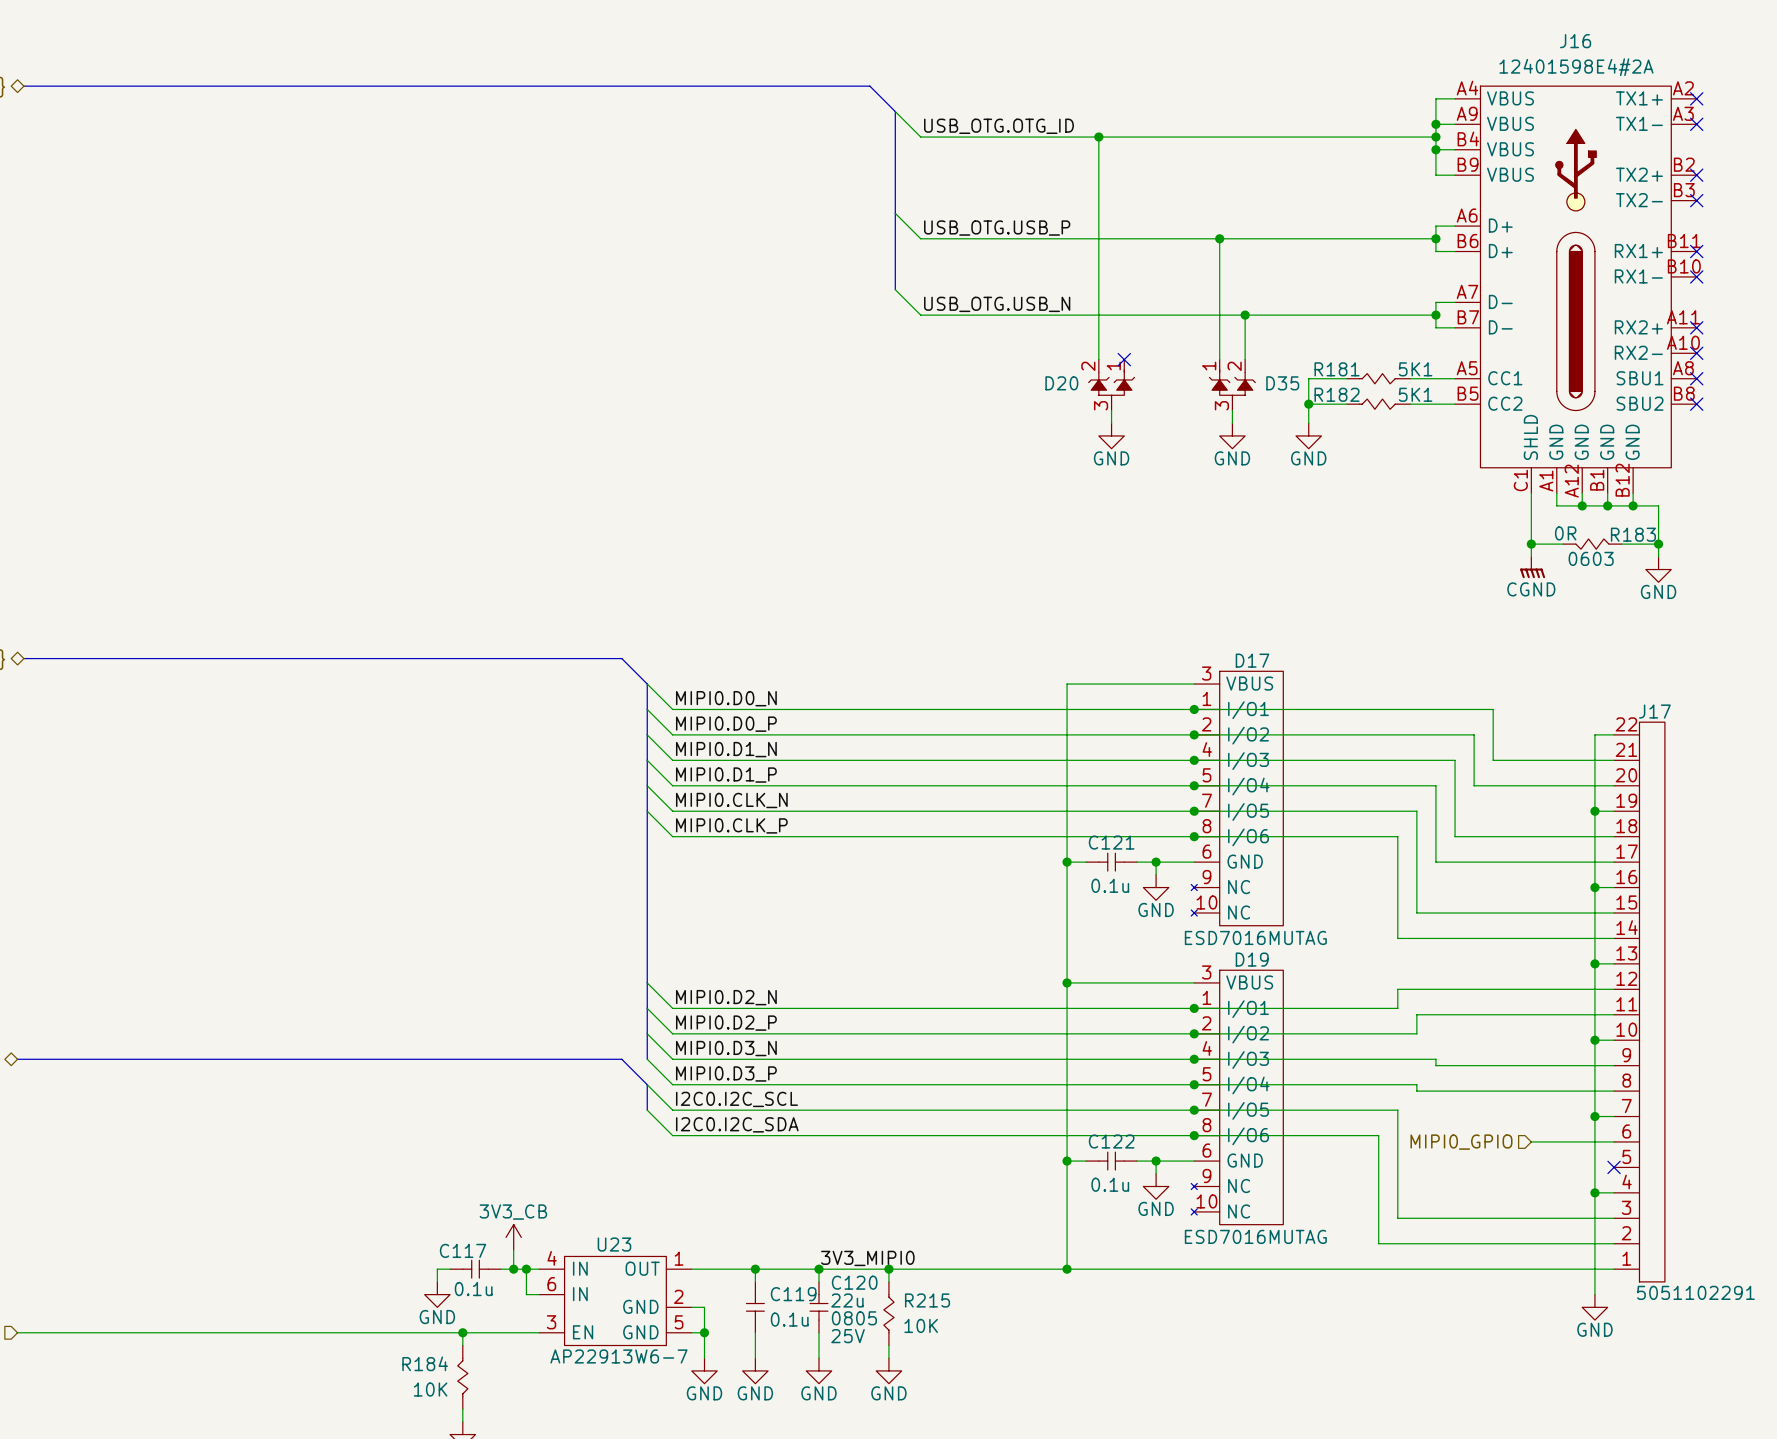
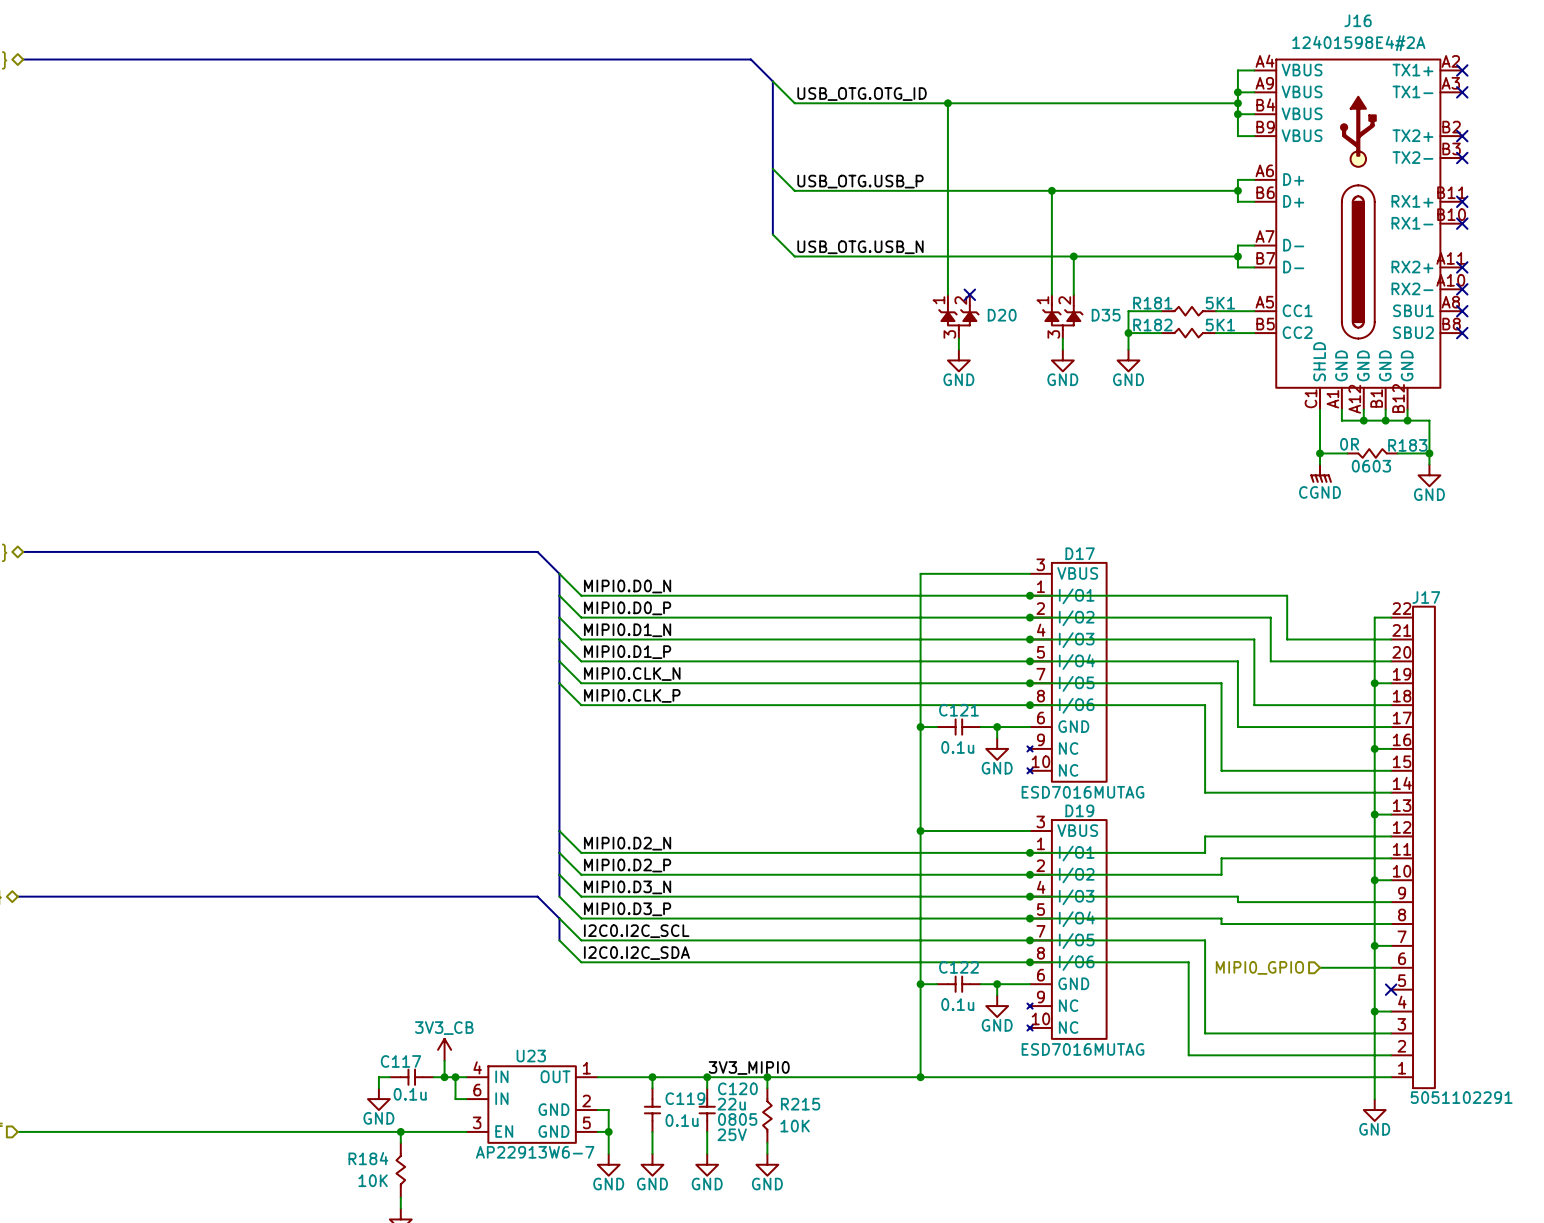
D20 flip: as is (1111, 385) -> left-right (958, 316)

